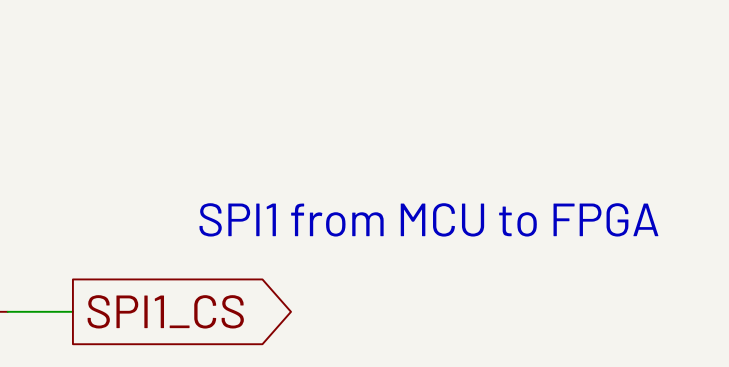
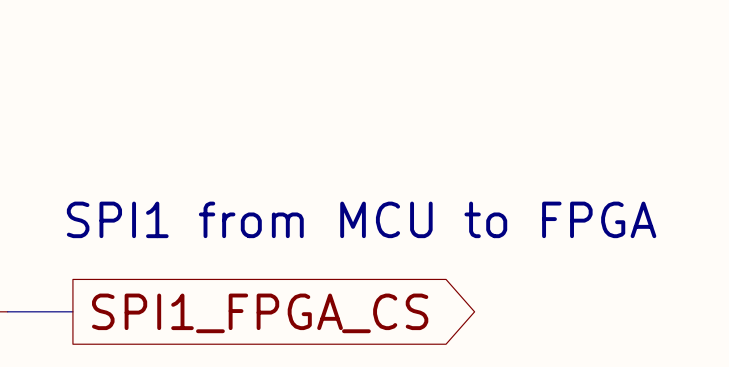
global label: SPI1_CS (165, 311) -> SPI1_FPGA_CS (260, 313)

